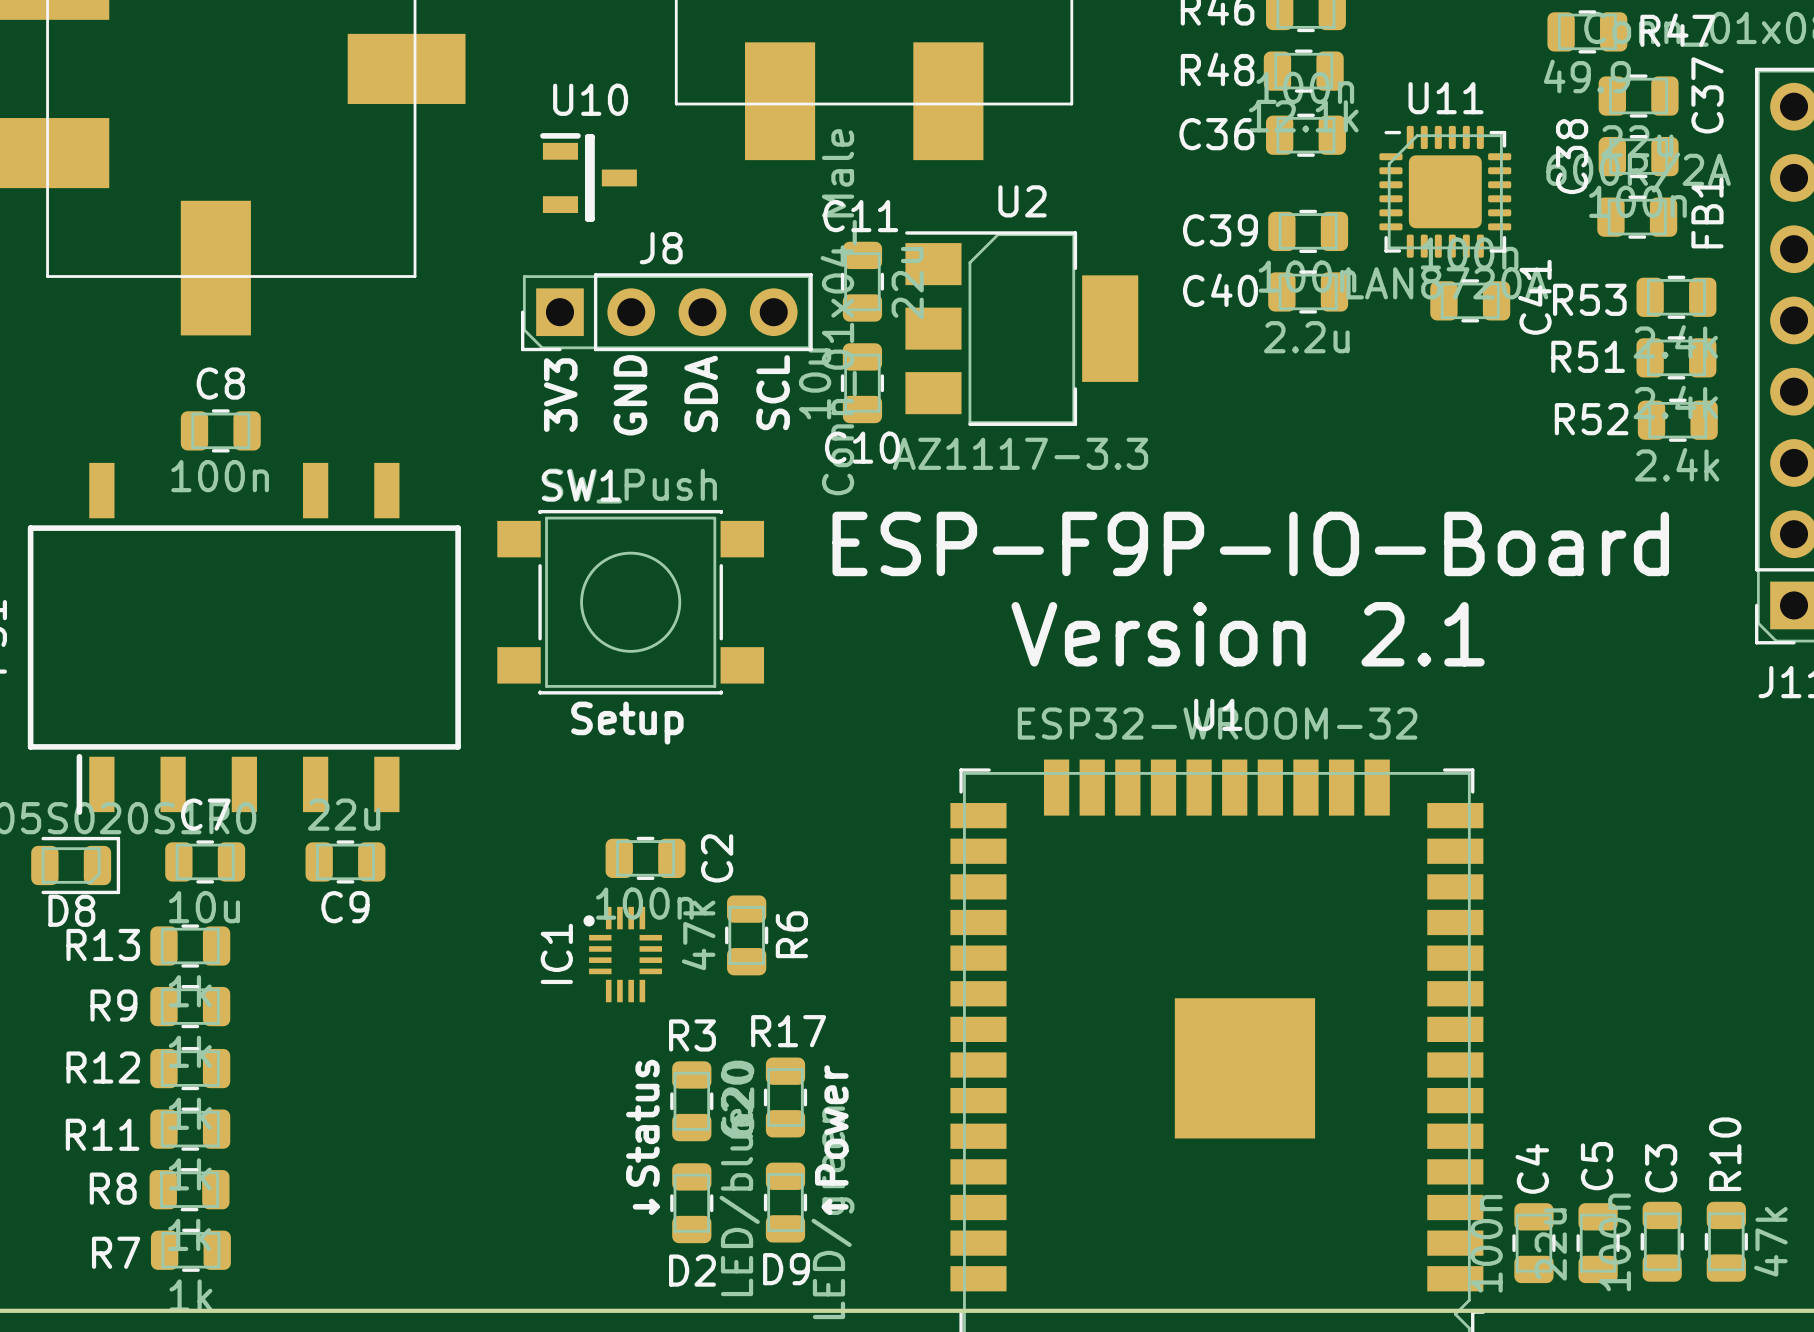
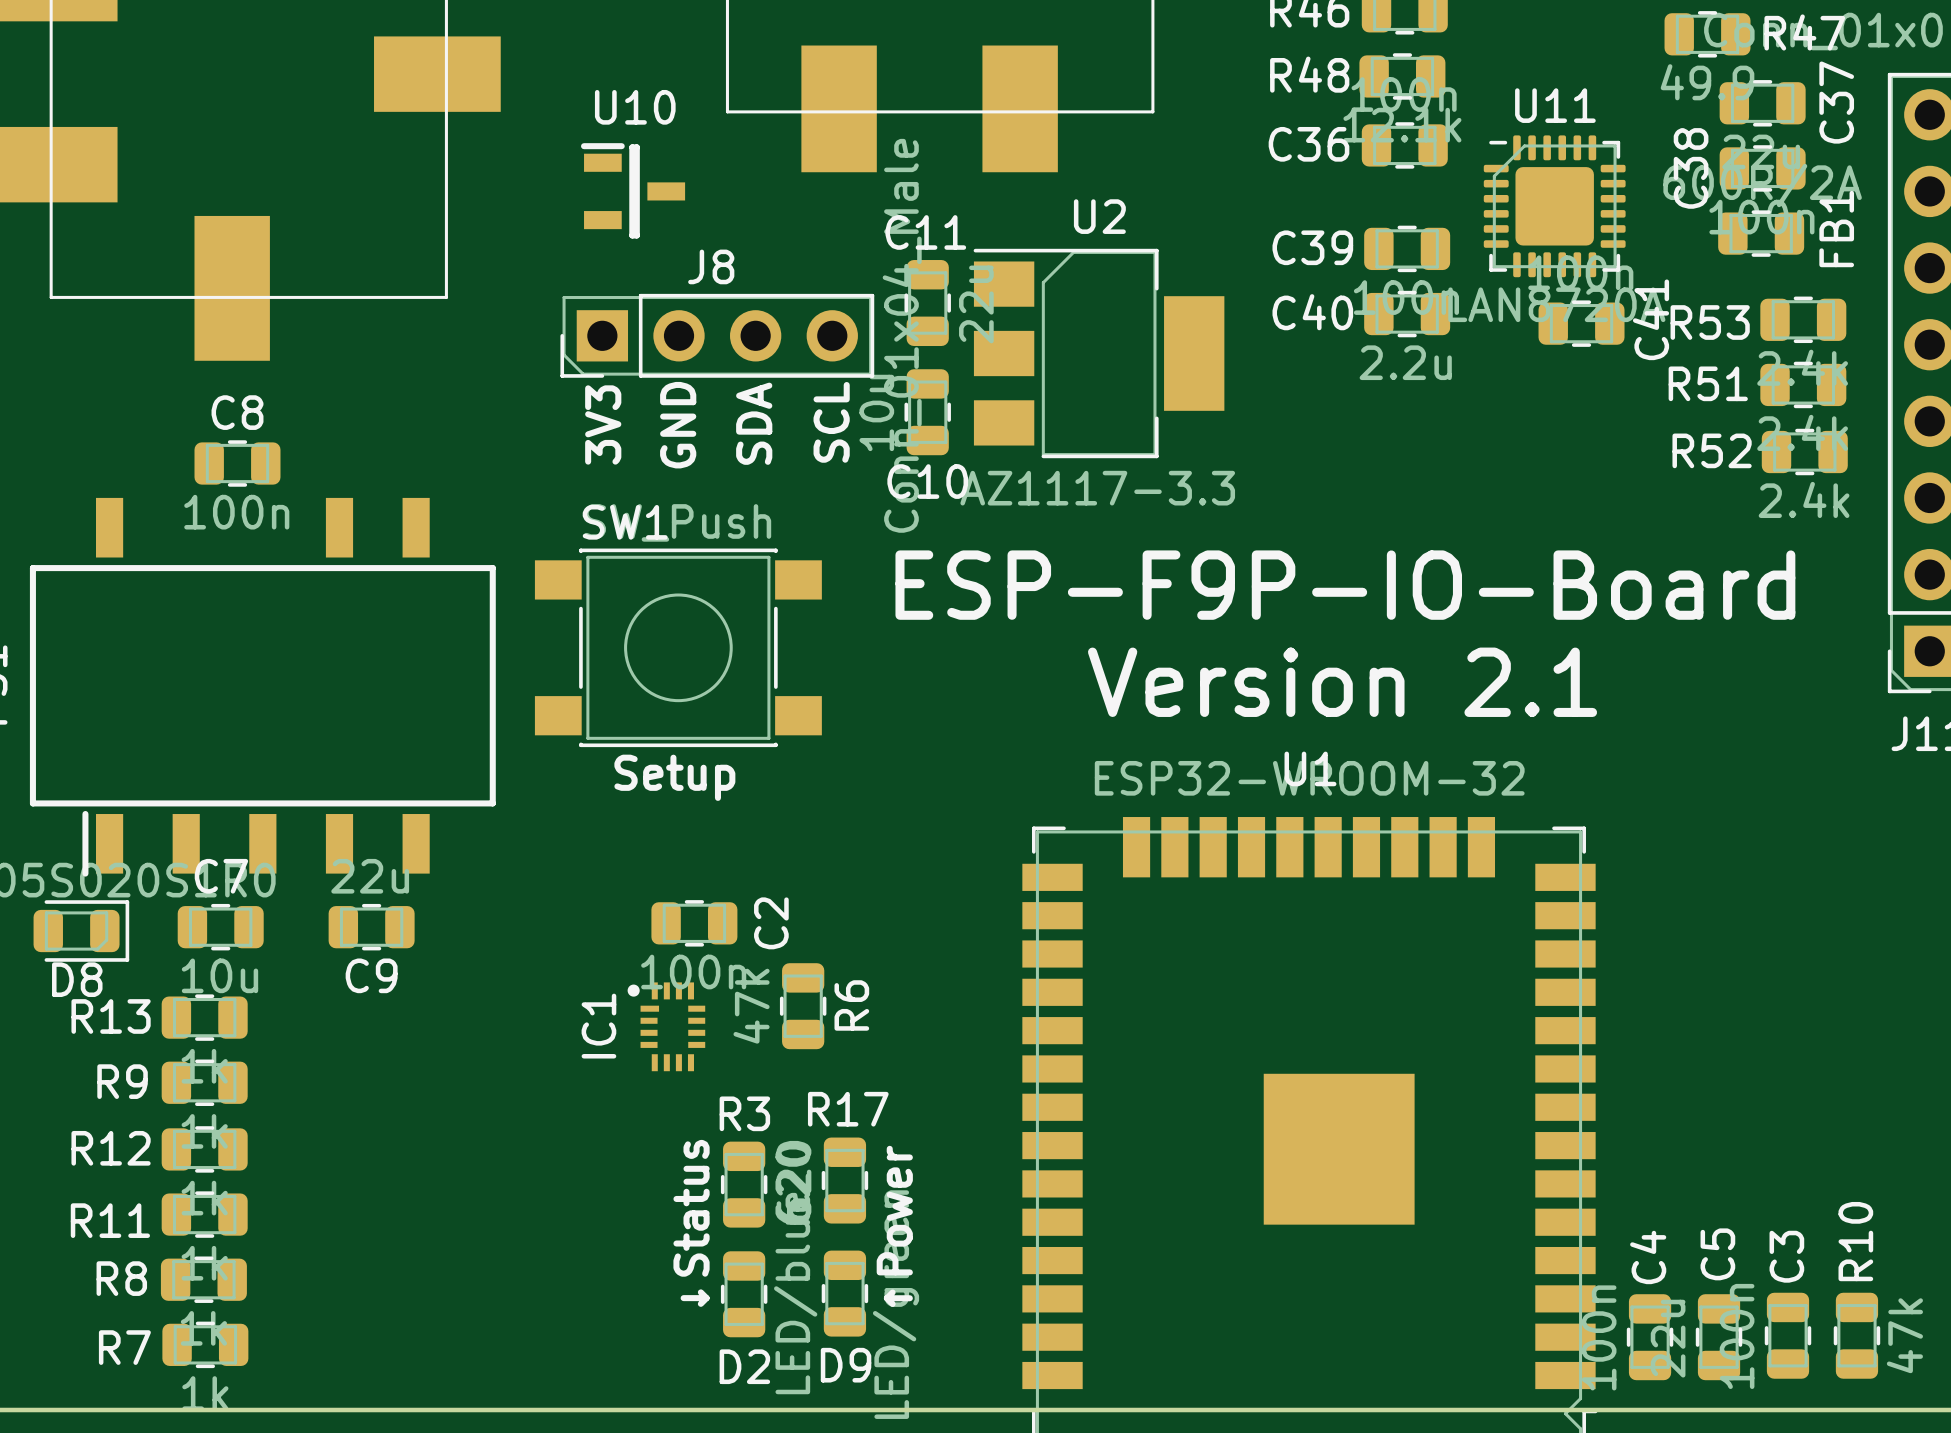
IC1 footprint: [583, 906, 663, 1003] -> [627, 982, 706, 1072]

